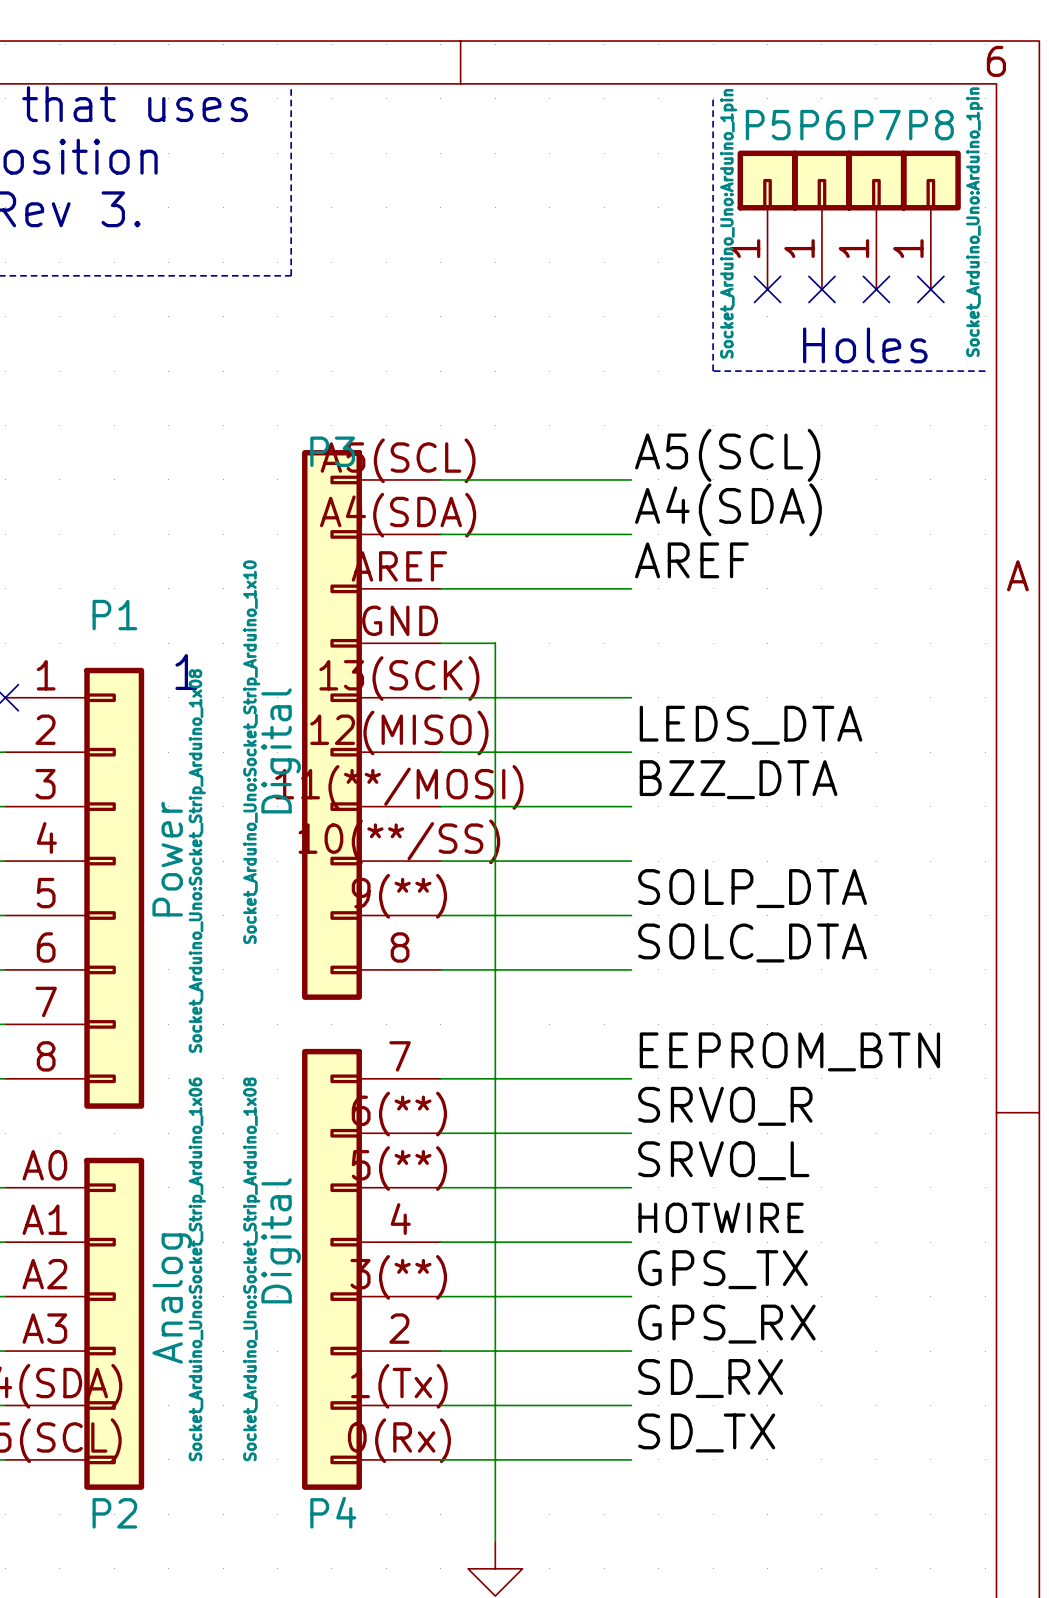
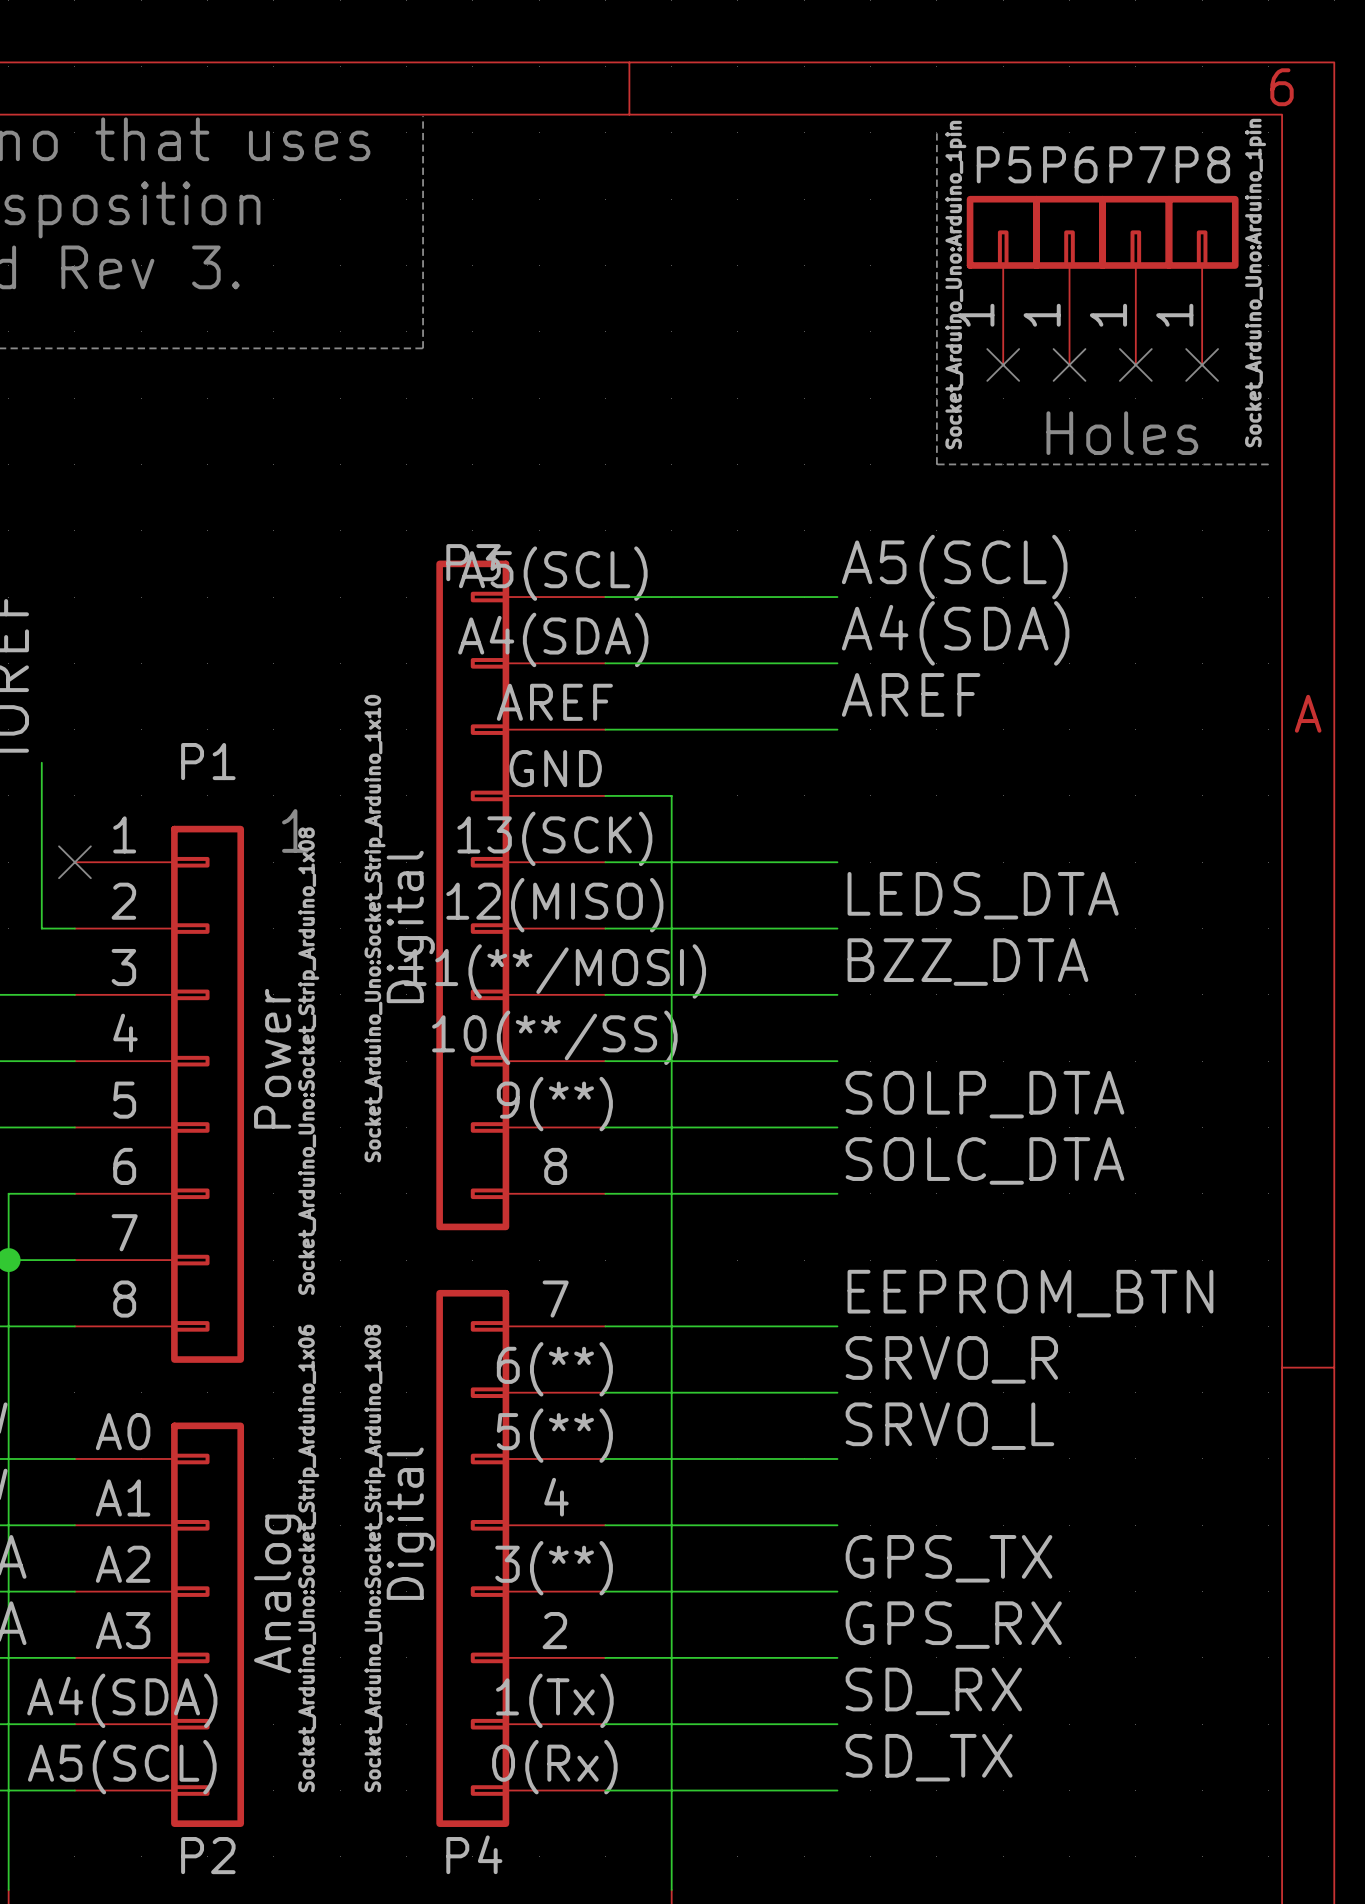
label: HOTWIRE (721, 1217) -> none

